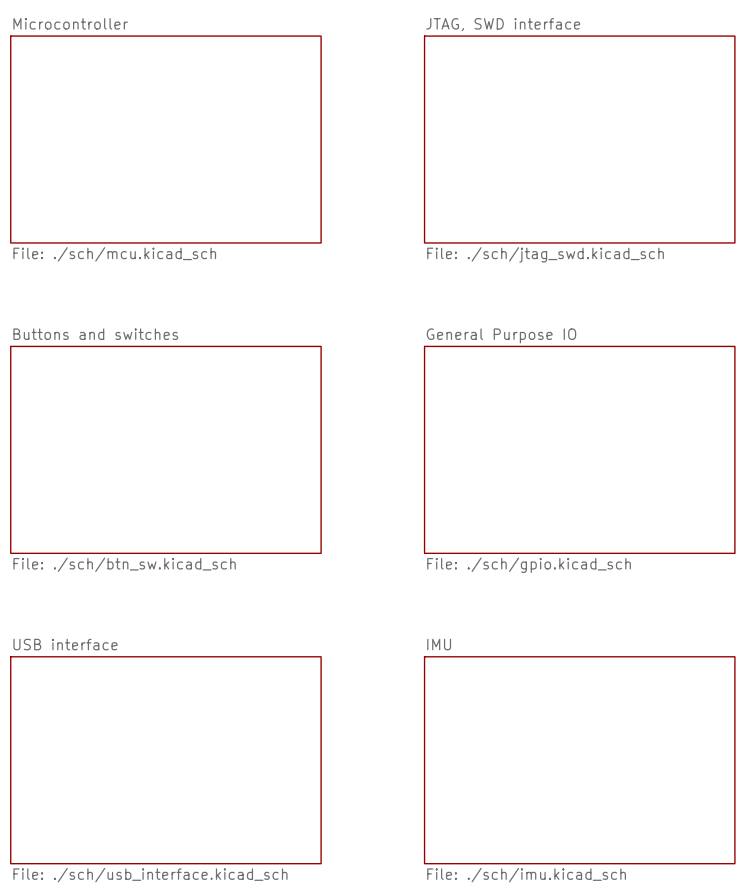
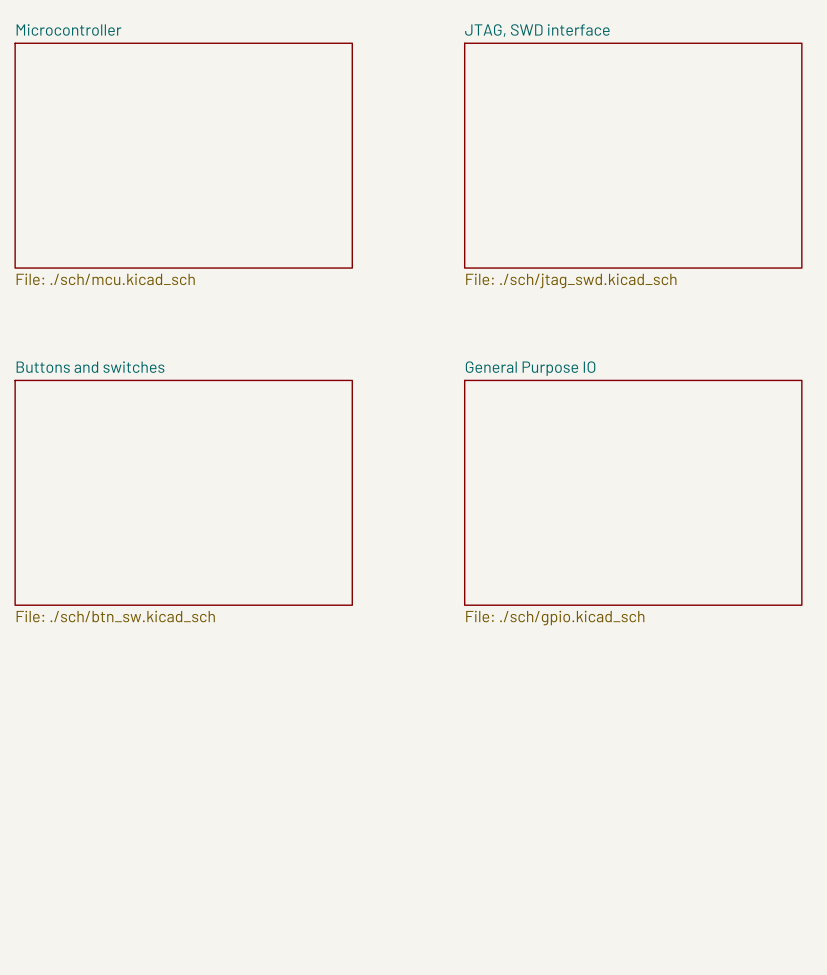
sheet USB interface: File: ./sch/usb_interface.kicad_sch (165, 760) -> none
sheet IMU: File: ./sch/imu.kicad_sch (579, 760) -> none

